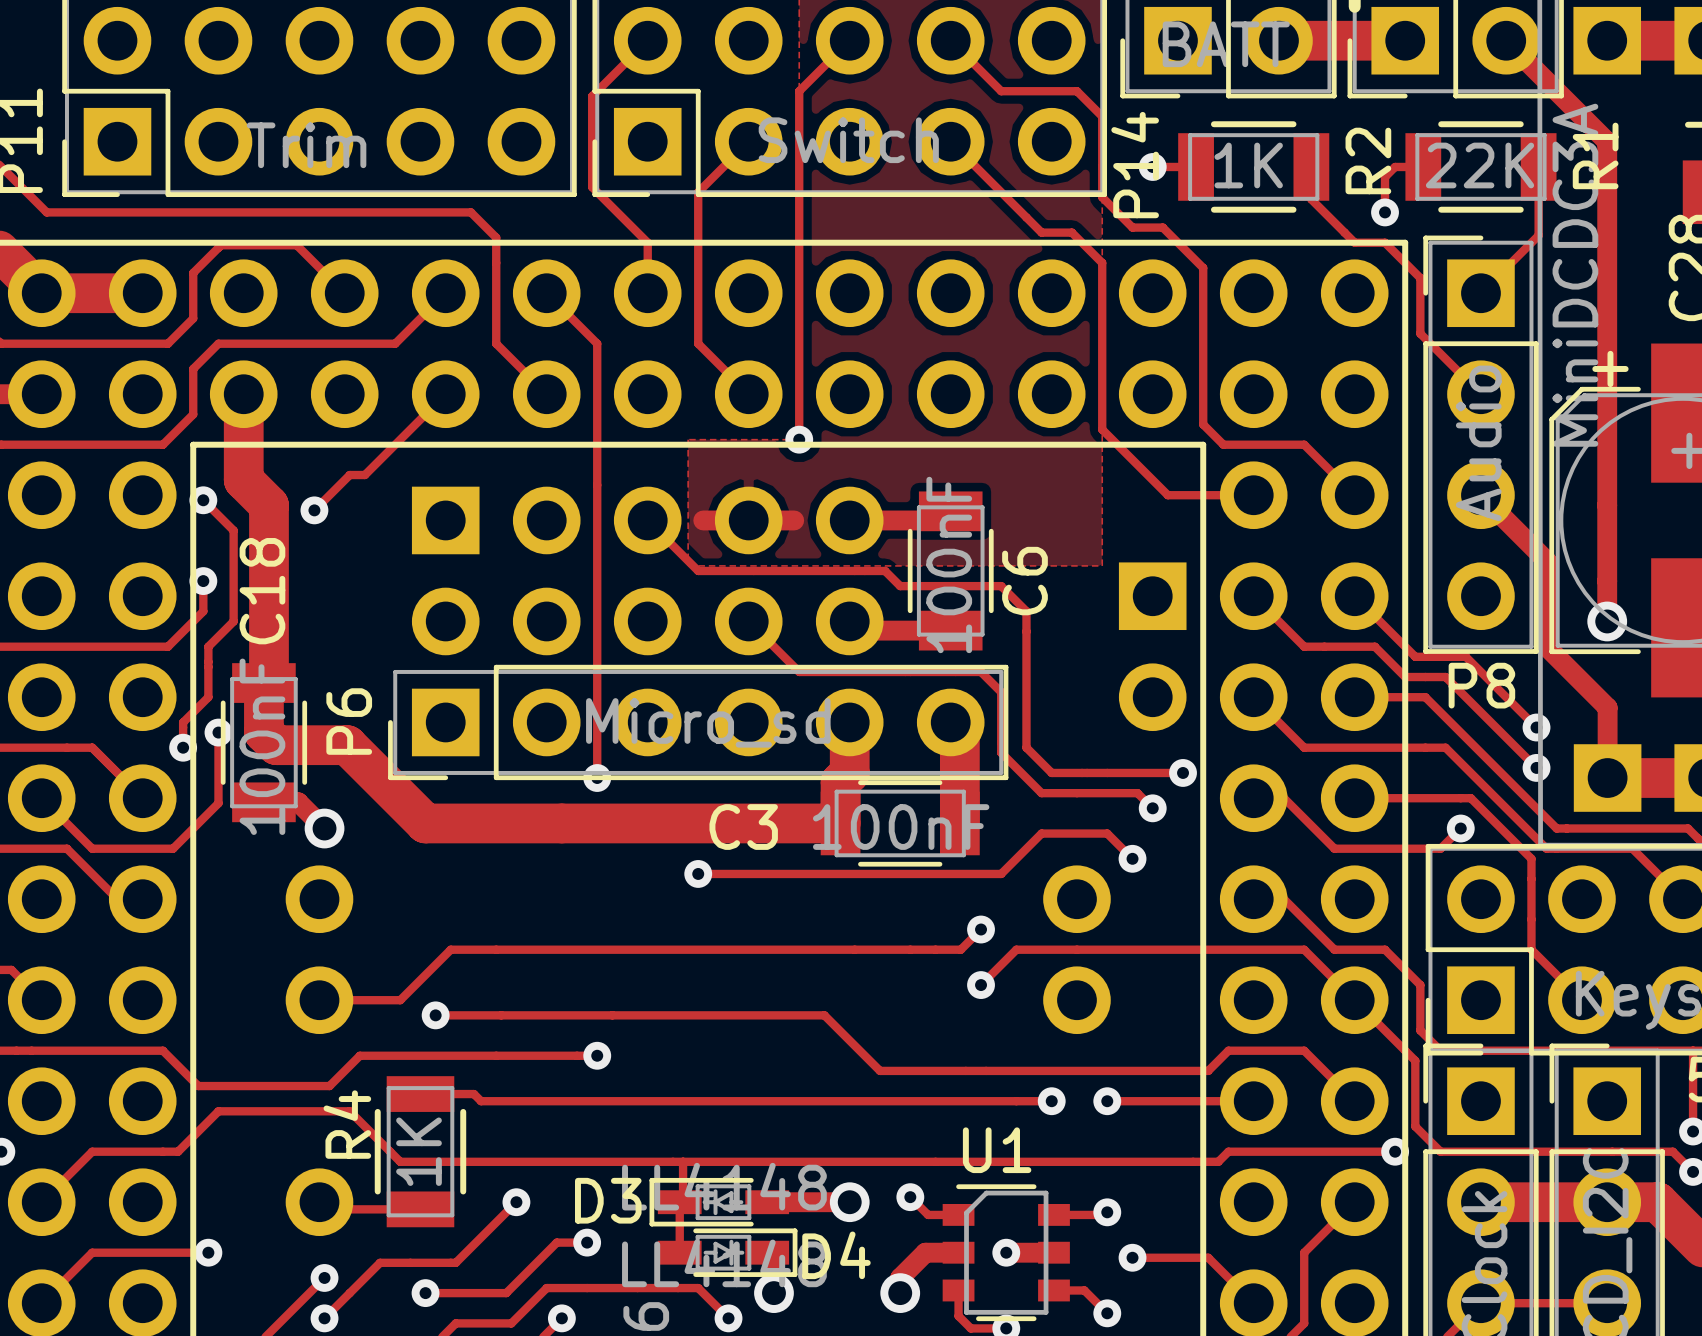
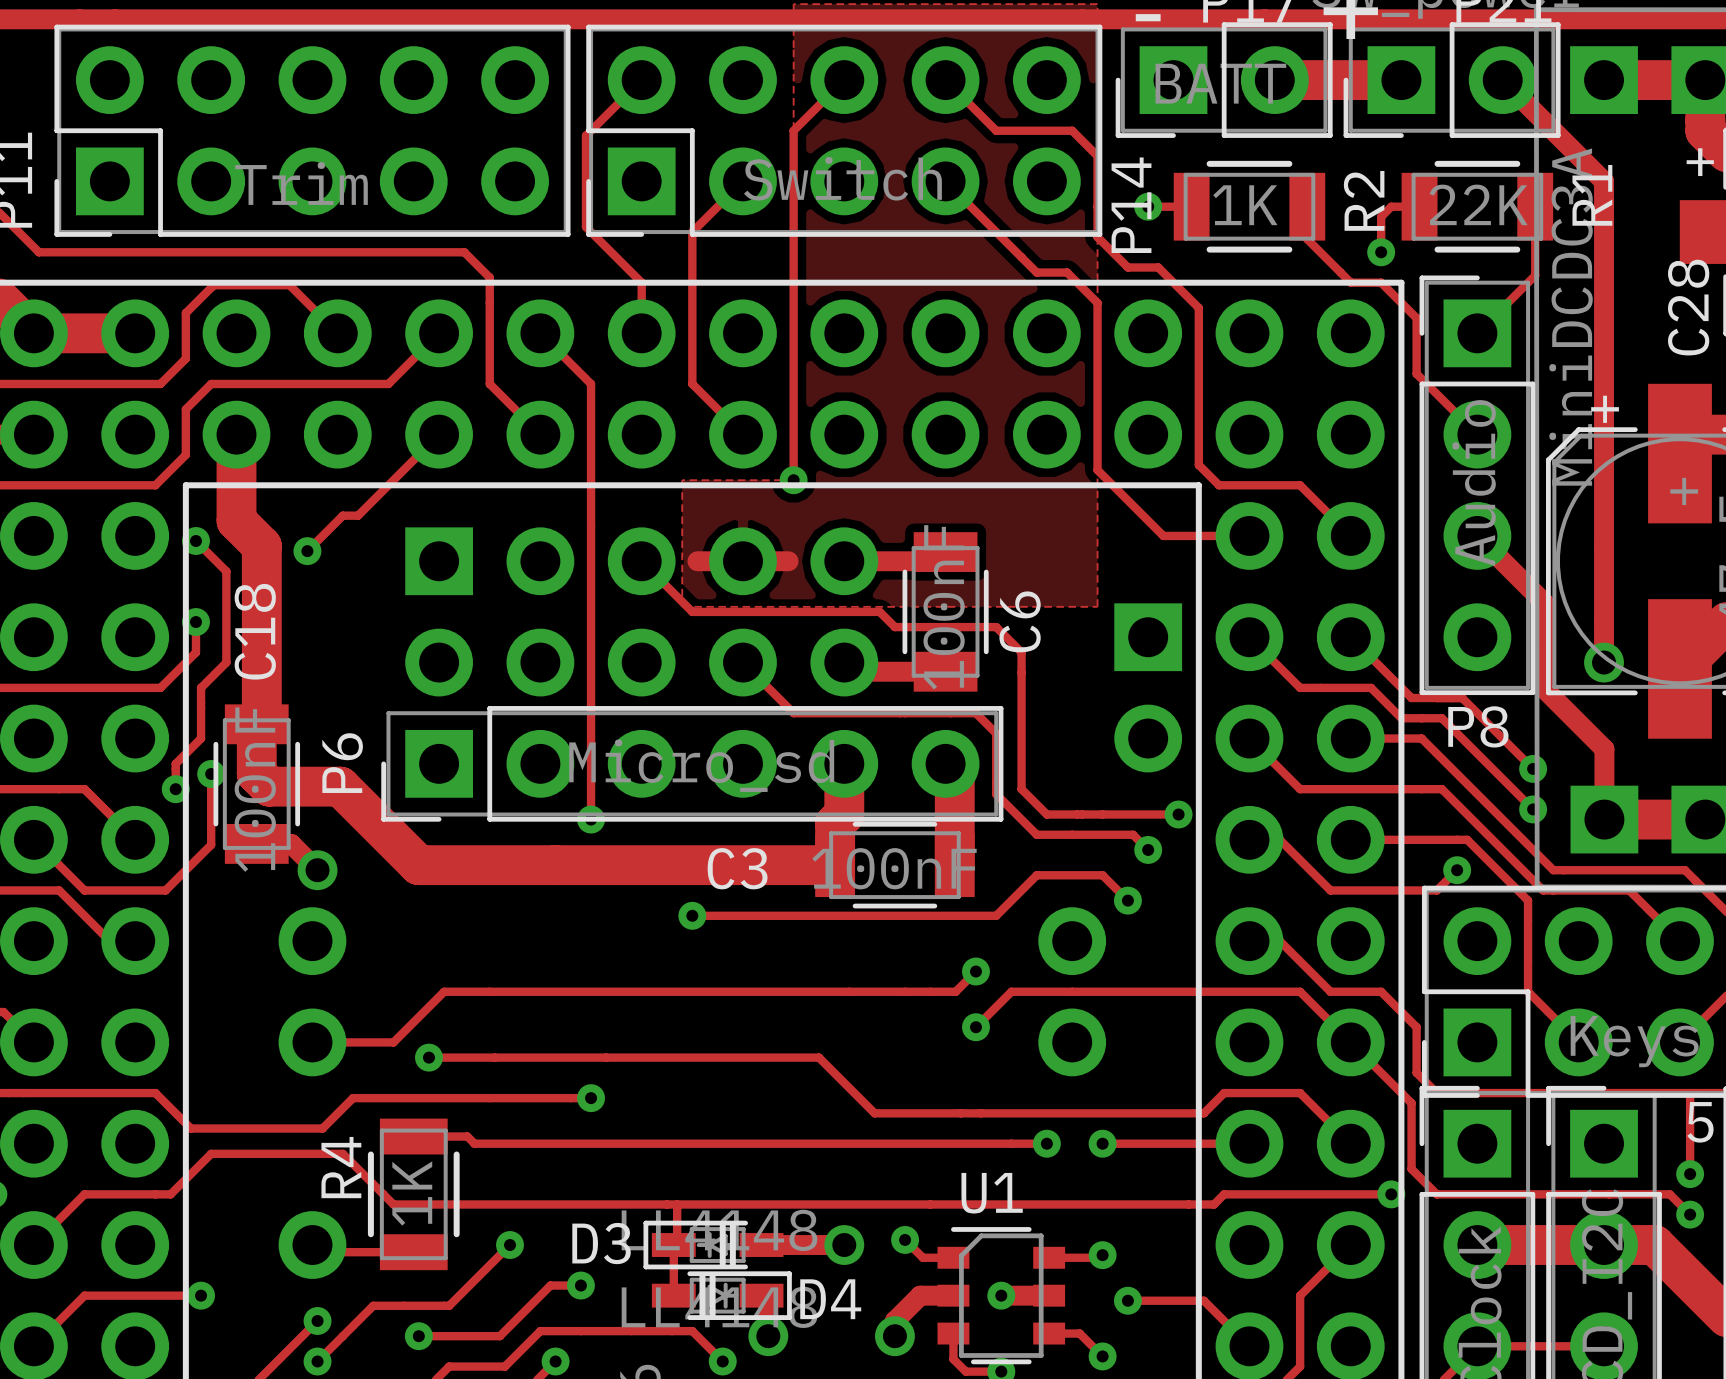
line: none -> (722, 1224) (722, 1265)
line: none -> (732, 1224) (732, 1265)
line: none -> (702, 1275) (702, 1315)
line: none -> (712, 1275) (712, 1315)

